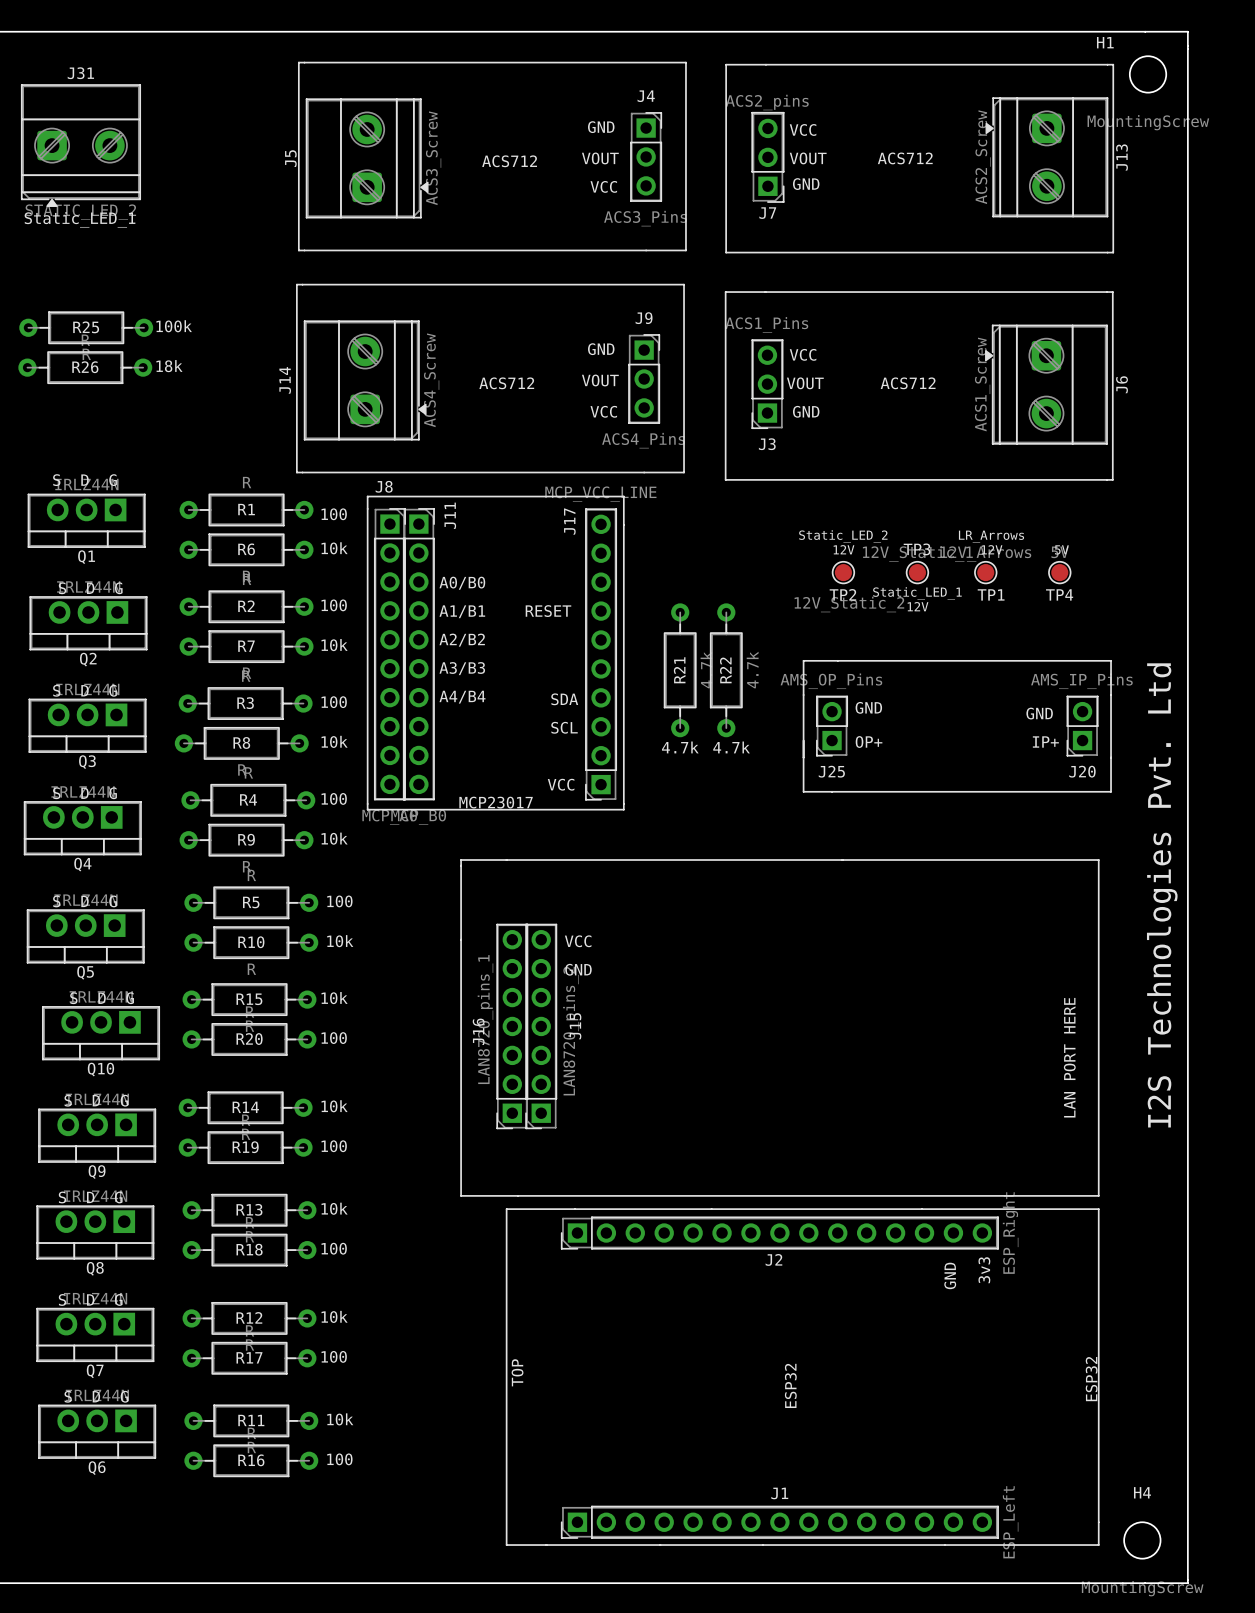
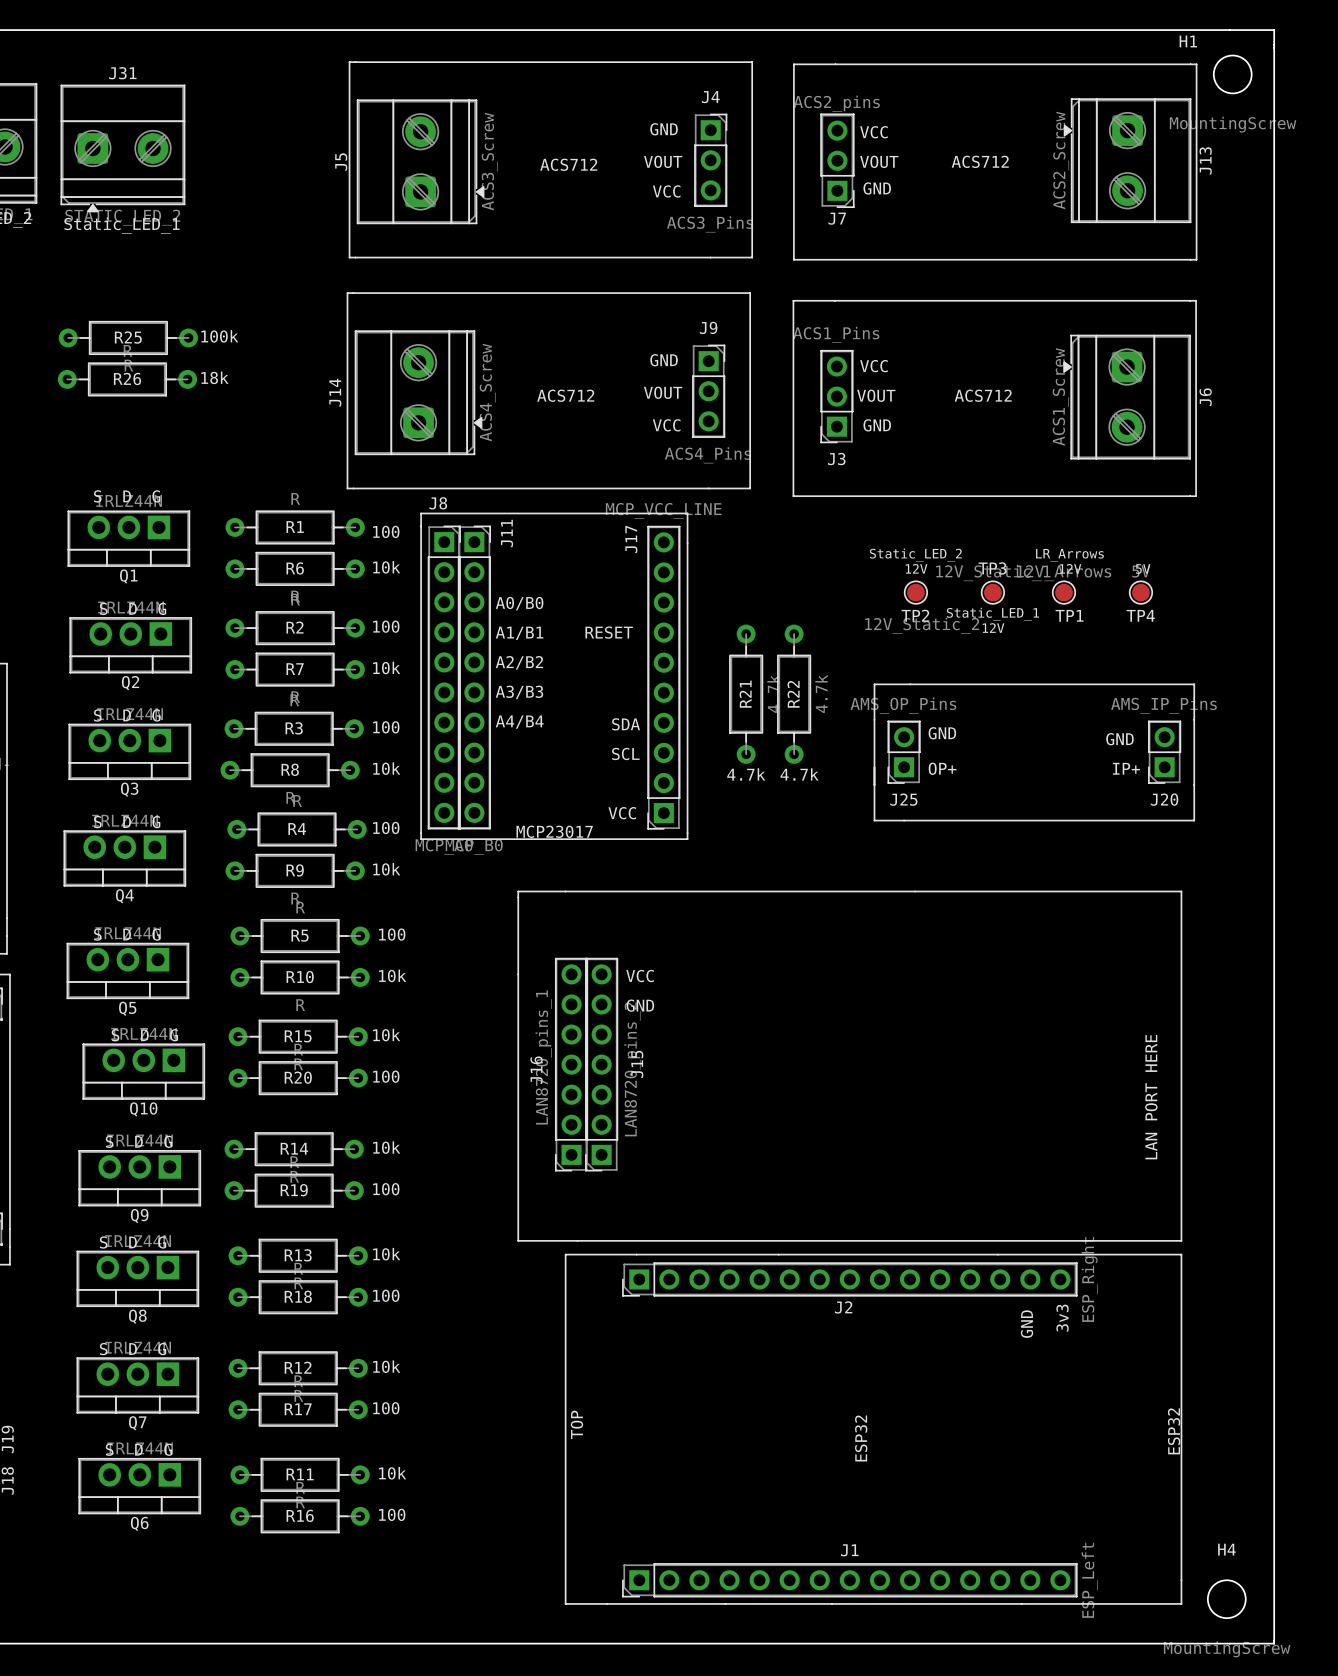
text: I2S Technologies Pvt. Ltd (1162, 895) -> none

